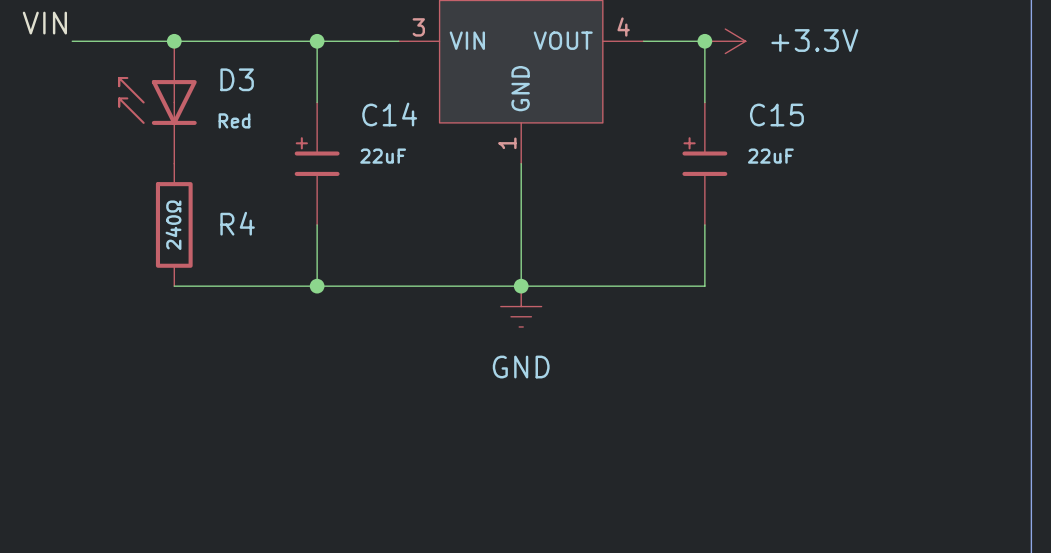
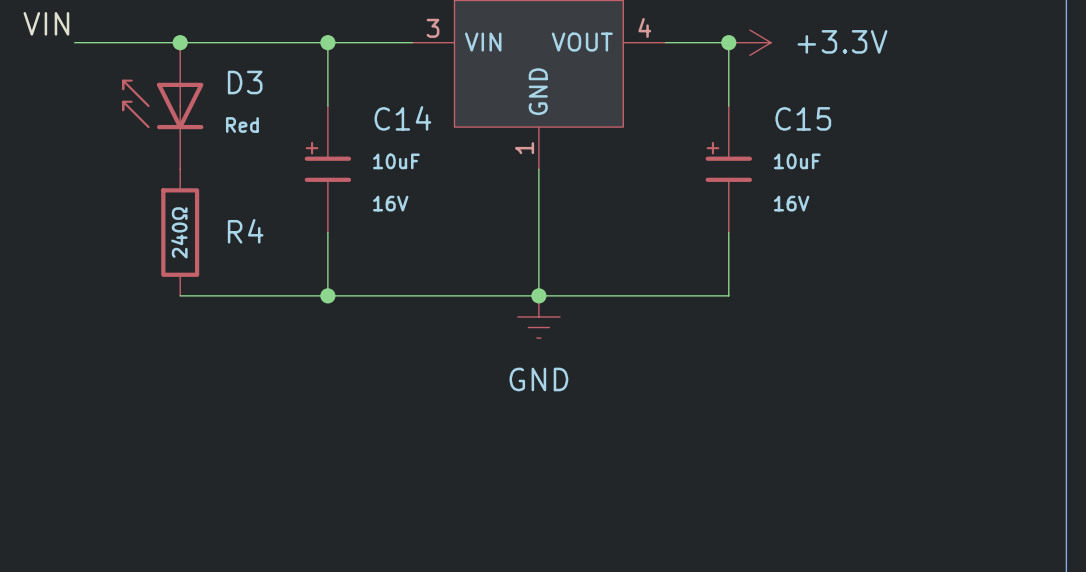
C14 value: 22uF (383, 156) -> 10uF (396, 161)
C15 value: 22uF (770, 156) -> 10uF (797, 161)
C14 text: none -> 16V (390, 203)
C15 text: none -> 16V (791, 203)

